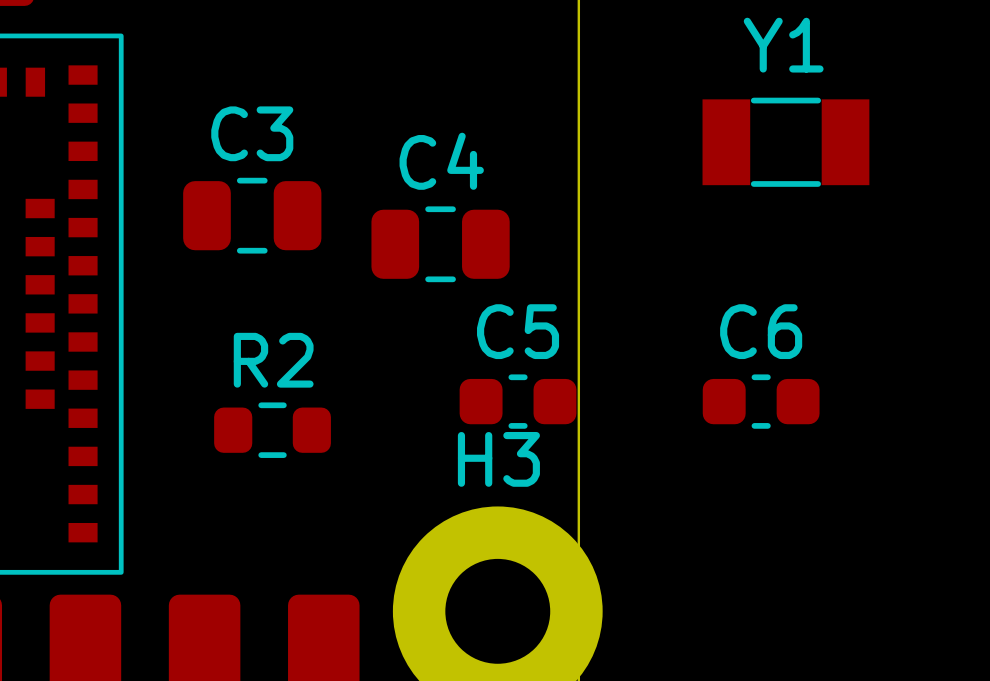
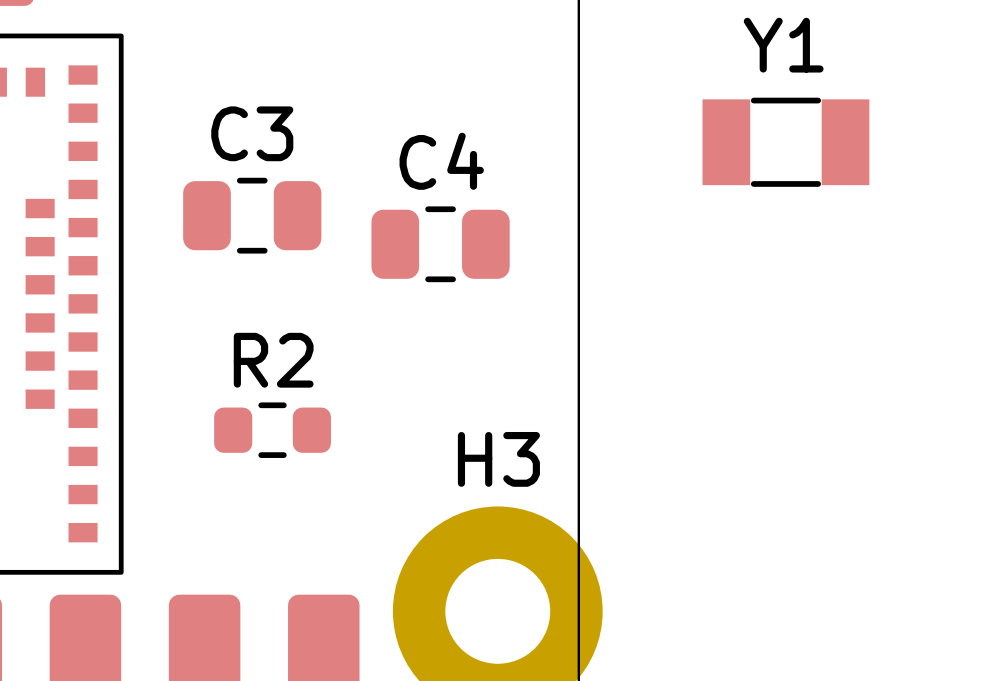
C5: (518, 401) -> none
C6: (761, 401) -> none

